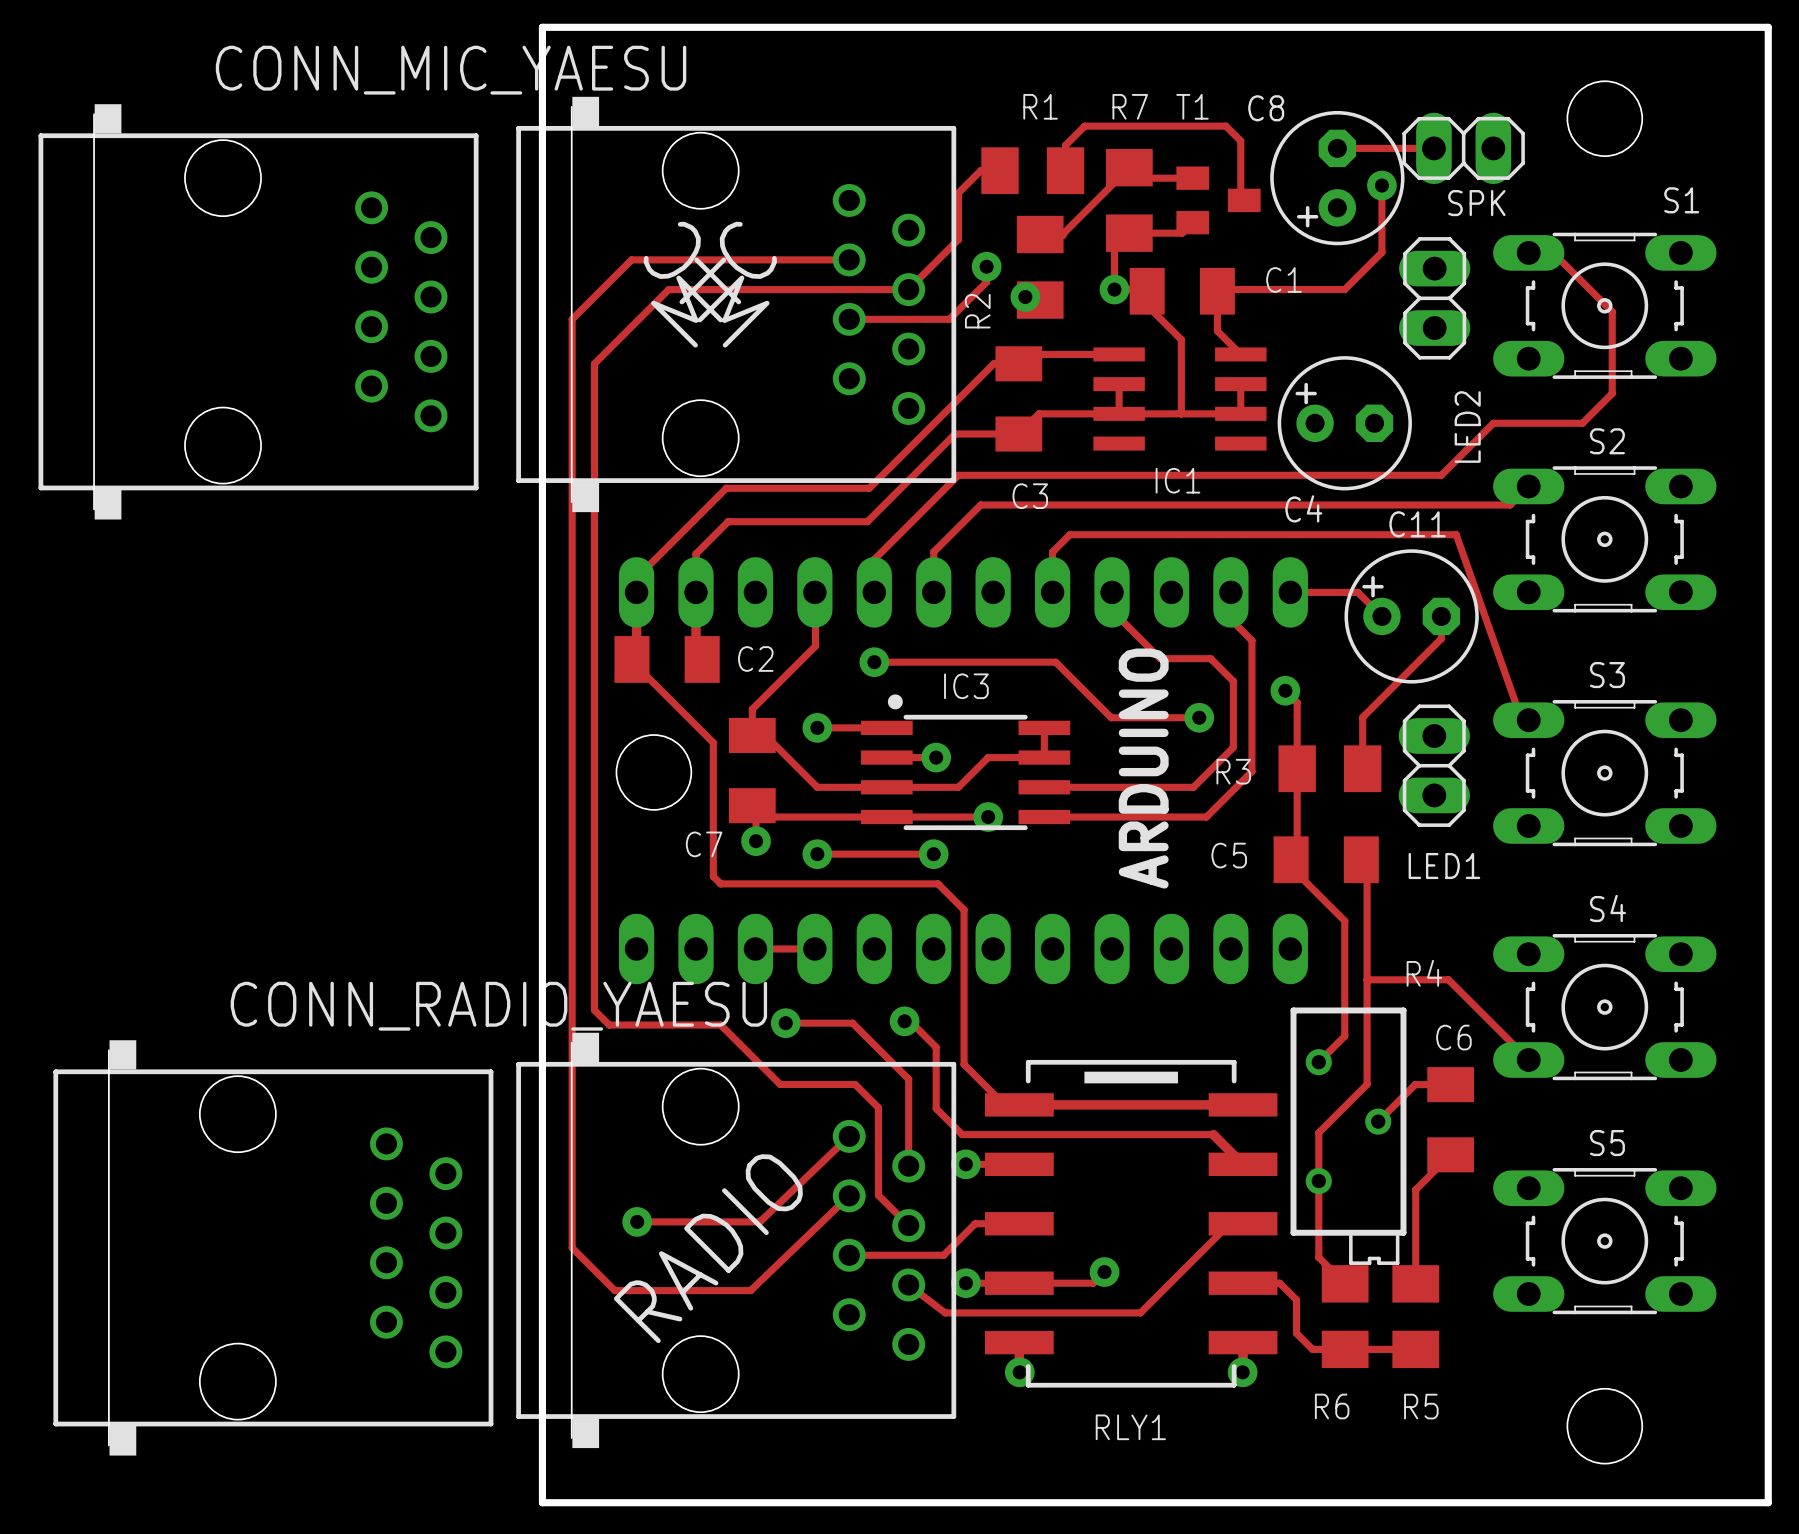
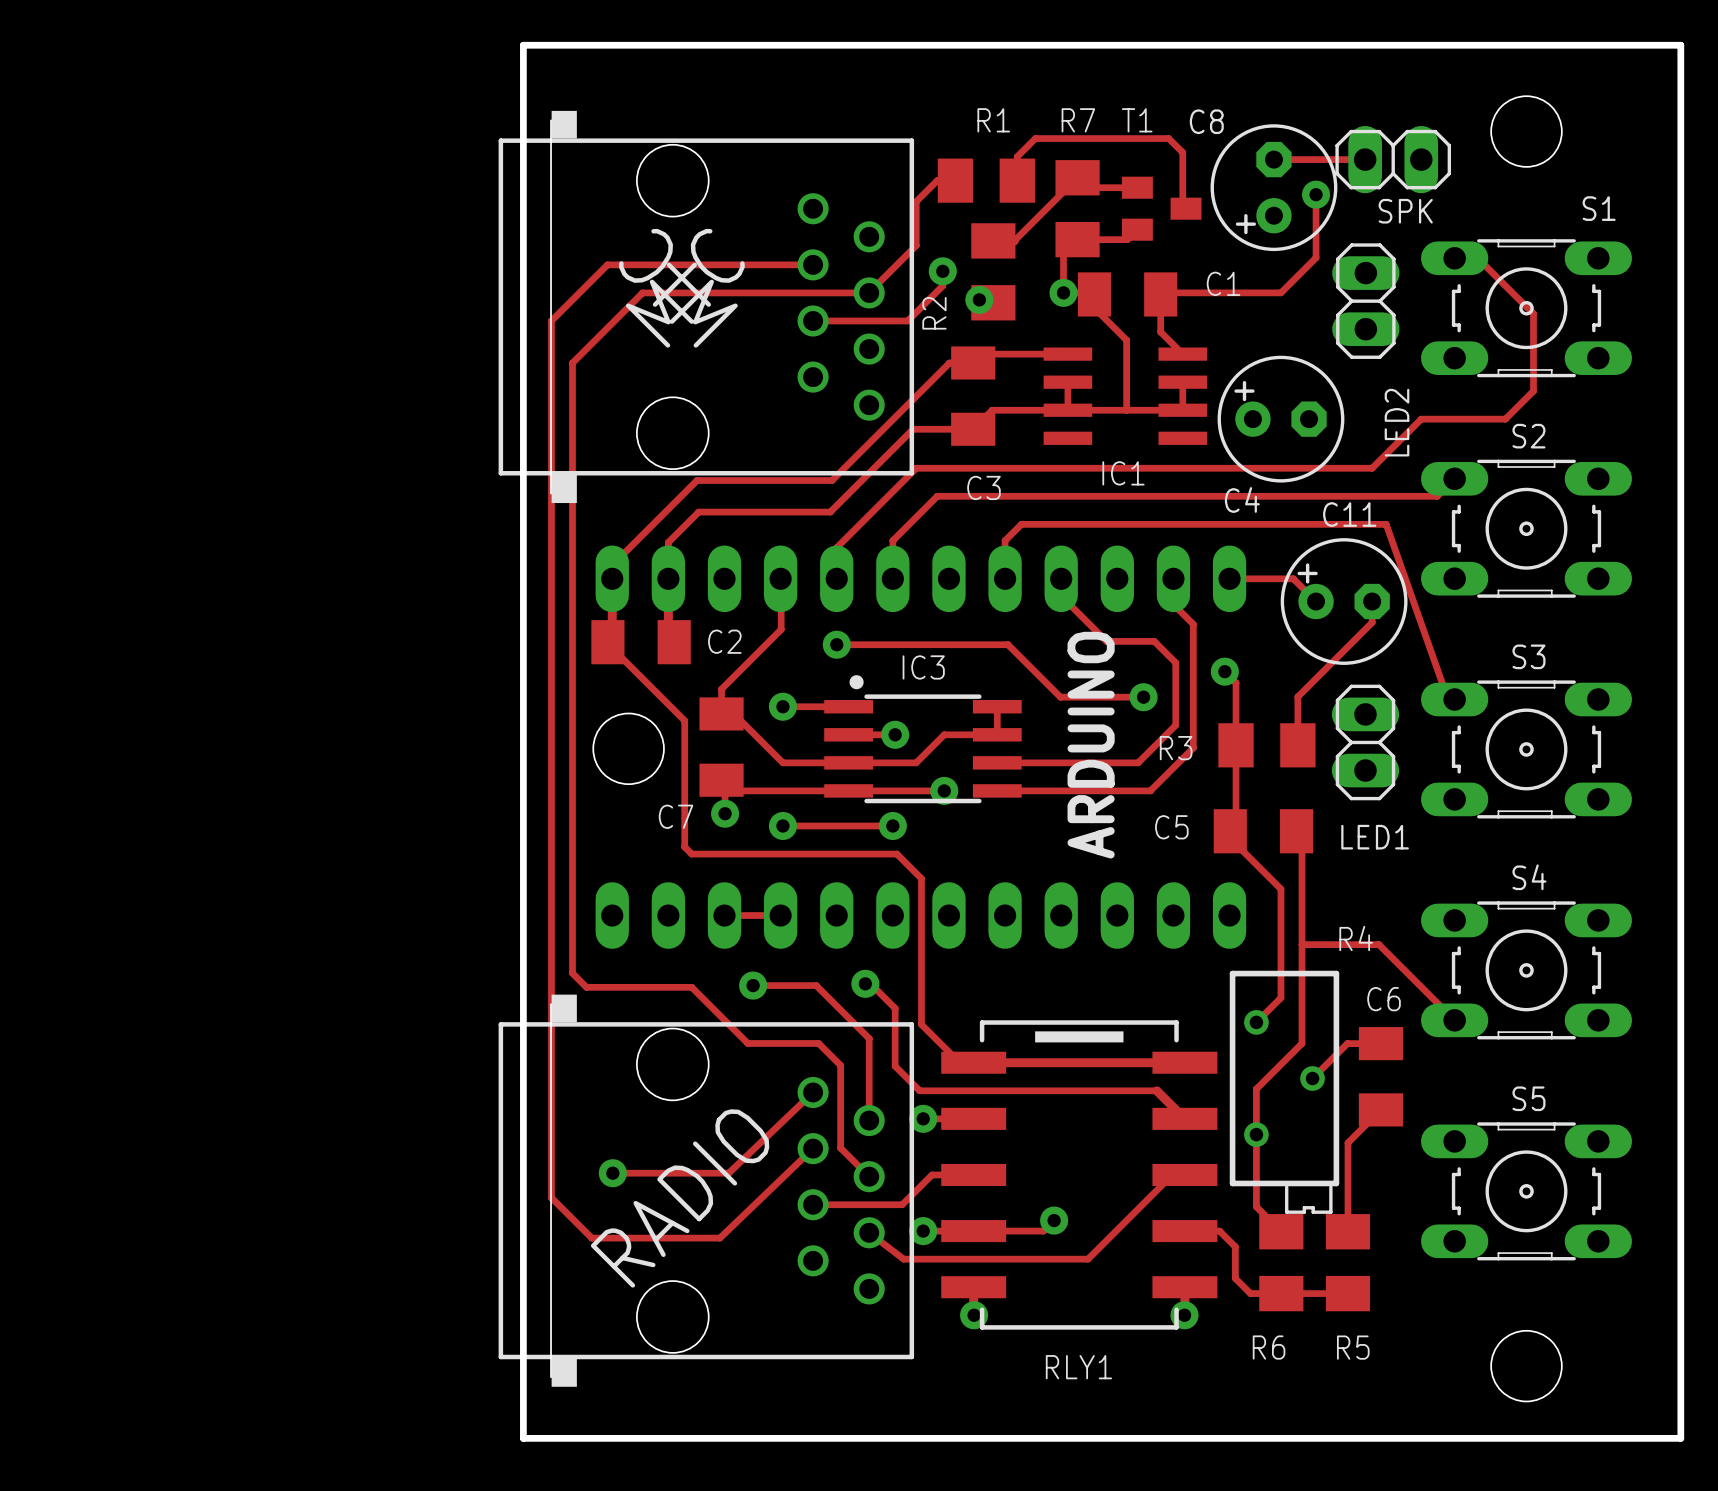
CONN_MIC_YAESU: (258, 311) -> none
CONN_RADIO_YAESU: (273, 1247) -> none

